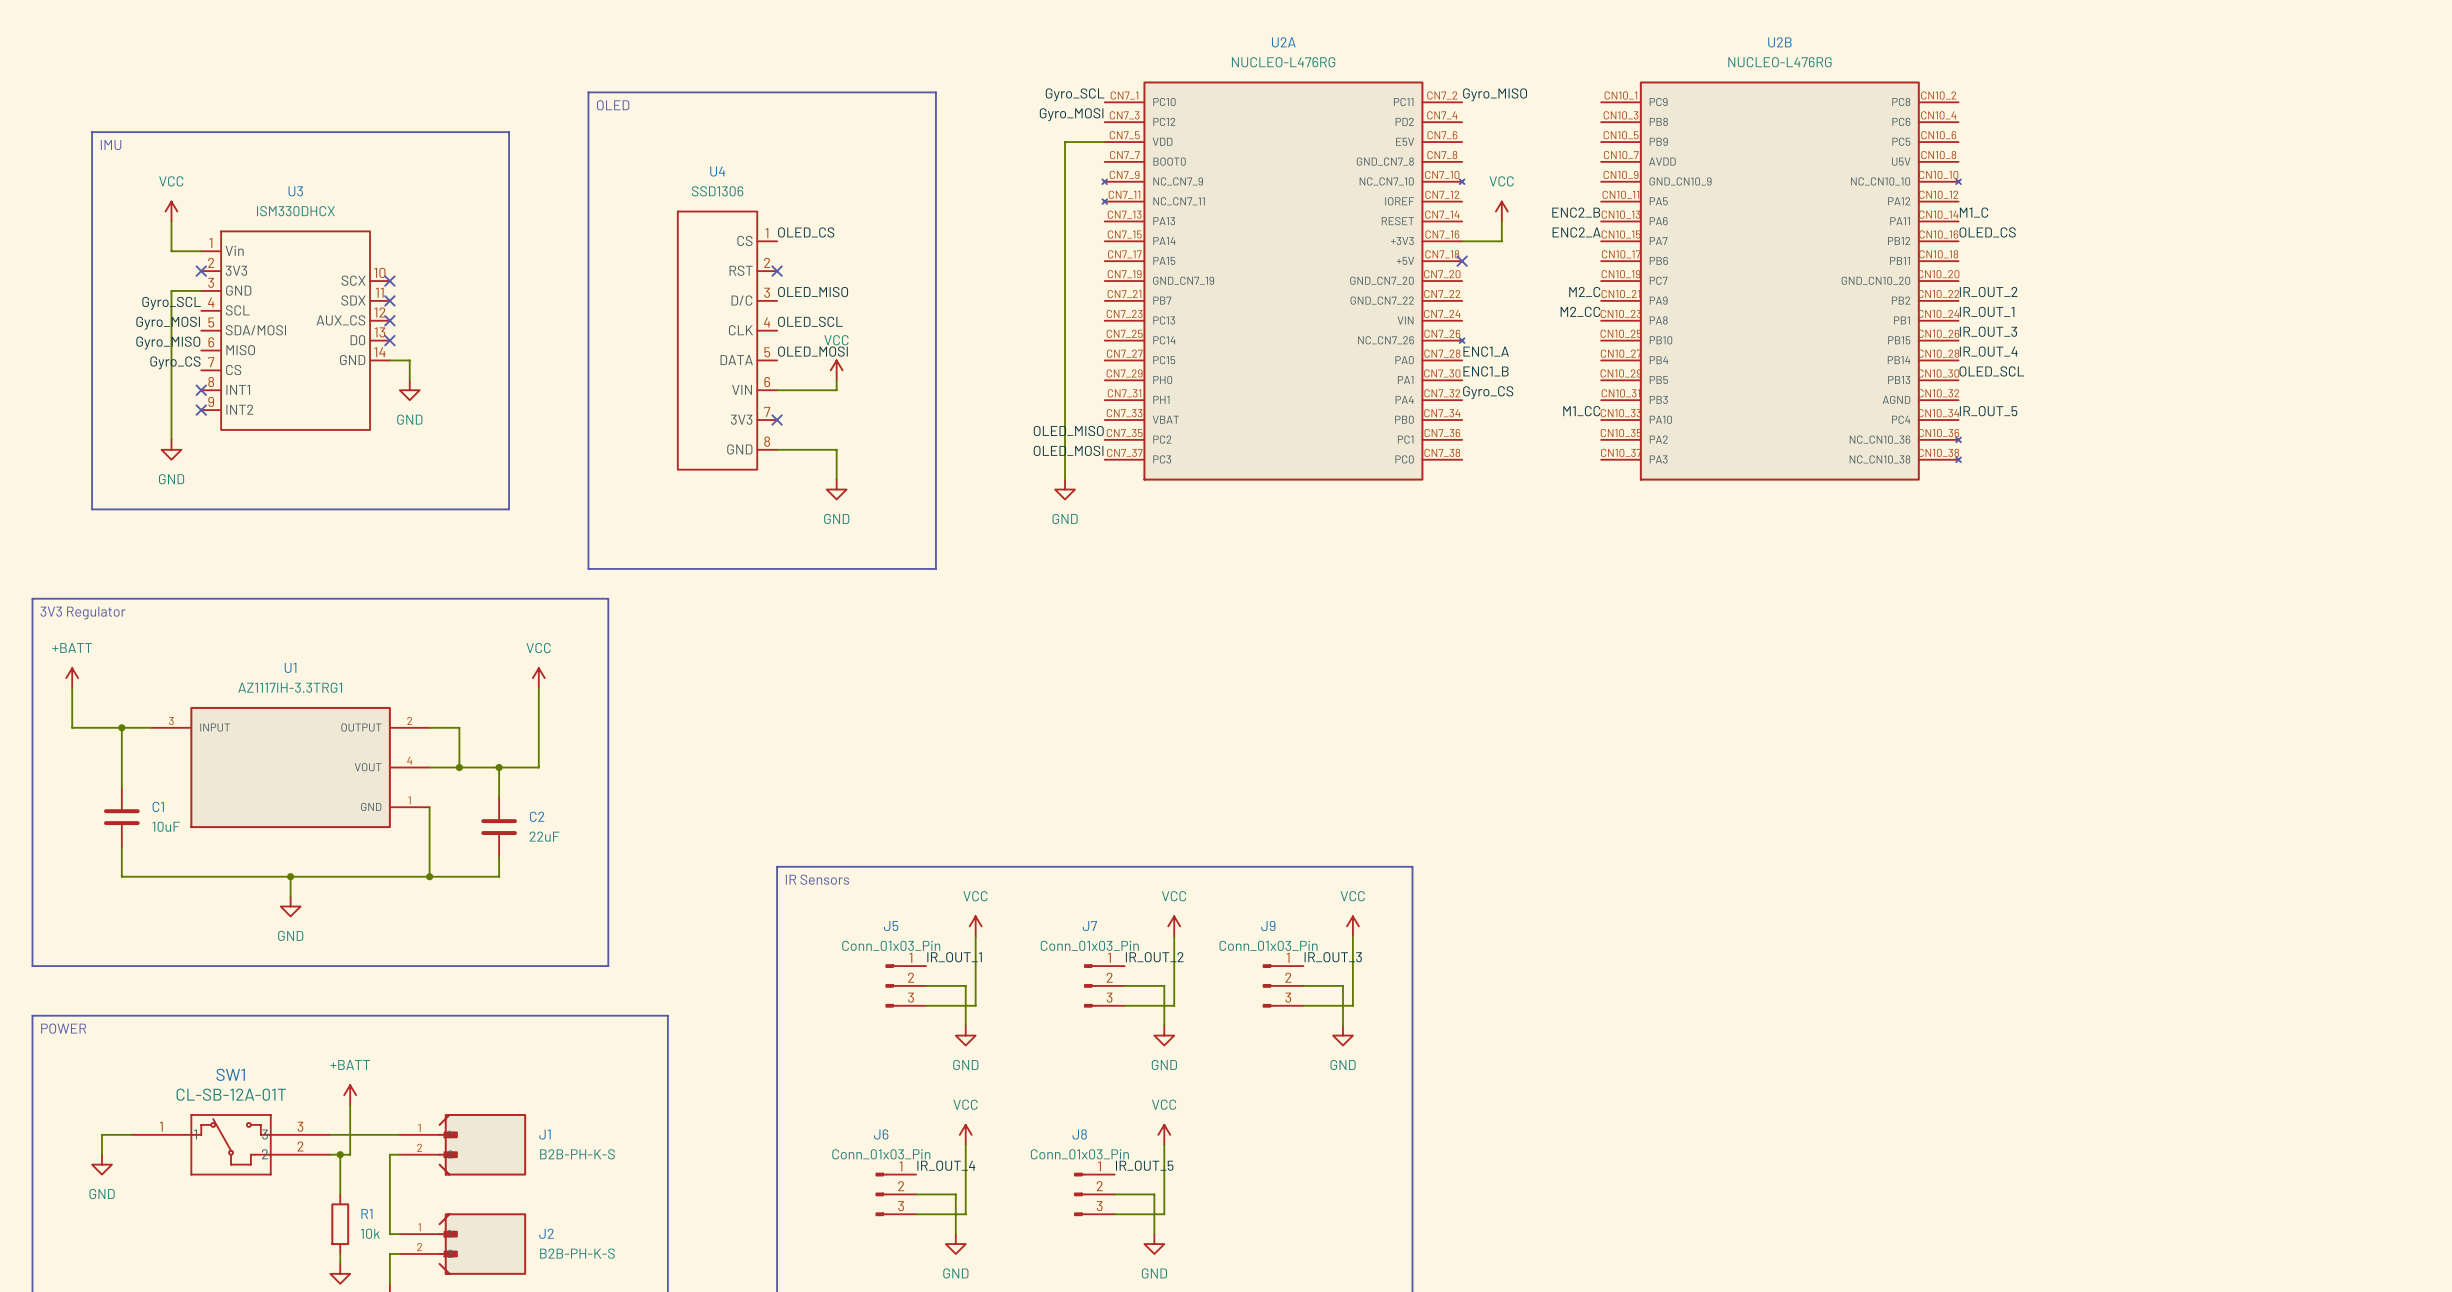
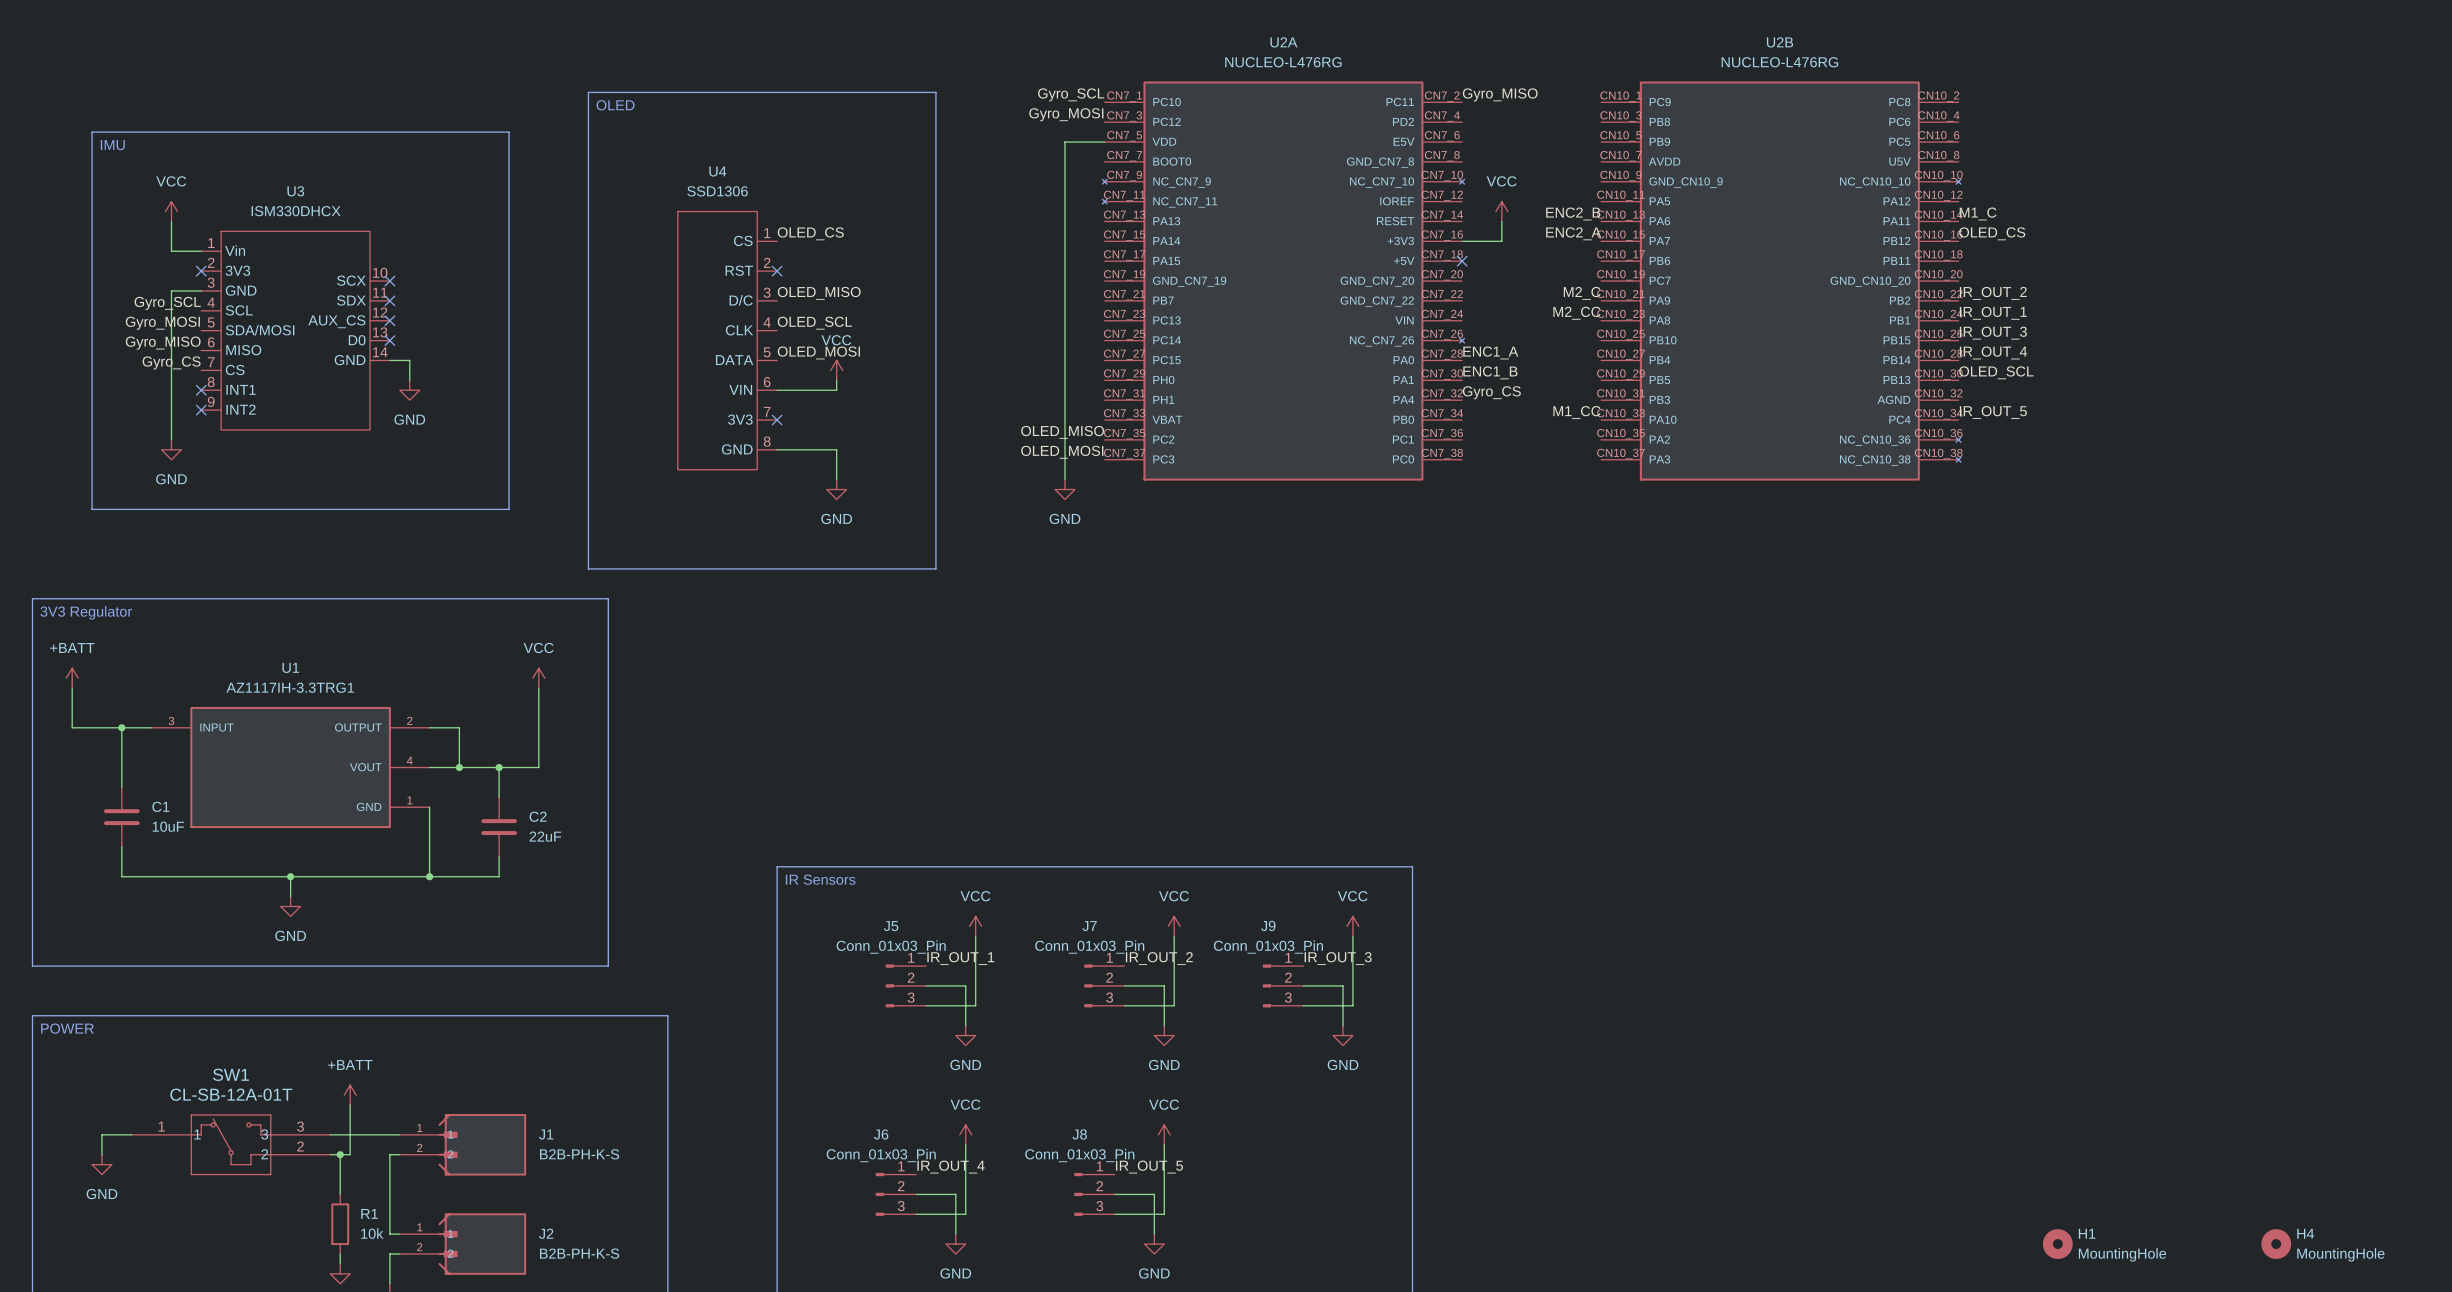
H1: none -> MountingHole (2057, 1244)
H4: none -> MountingHole (2276, 1244)

